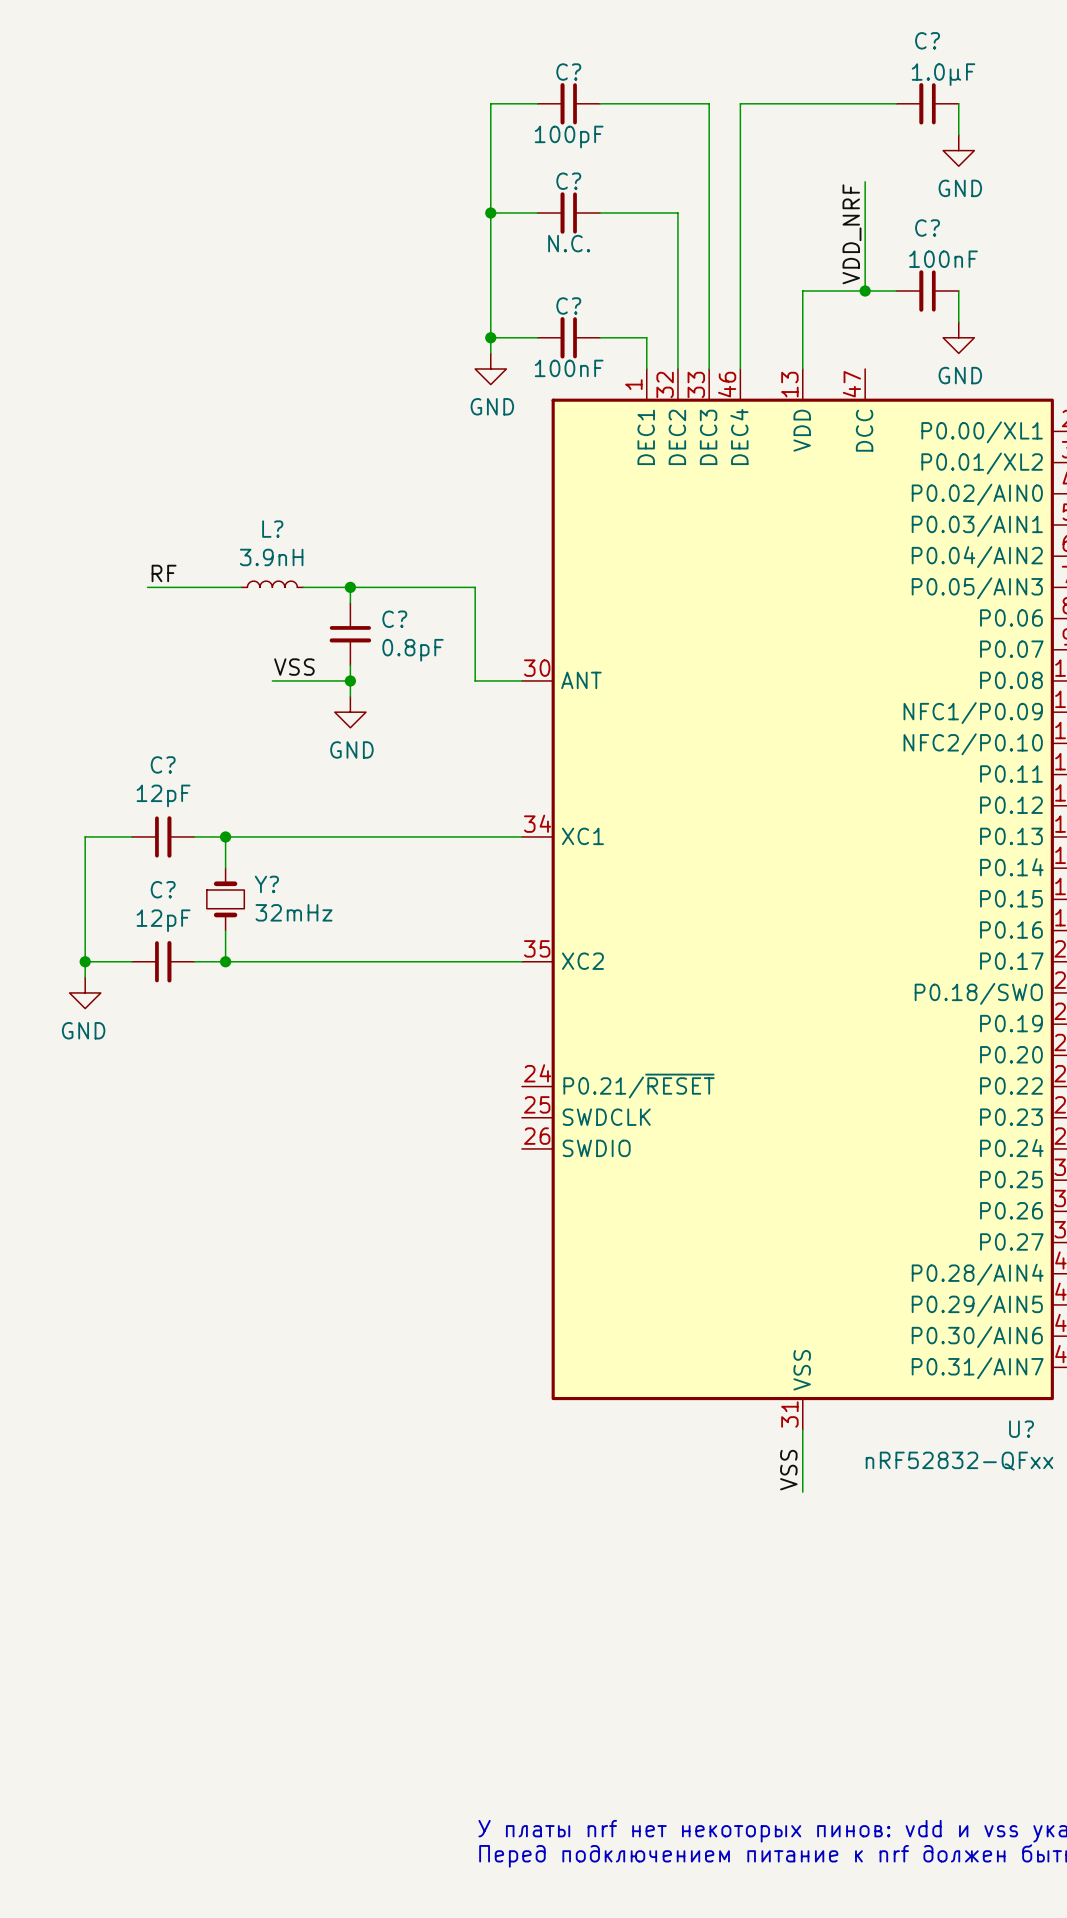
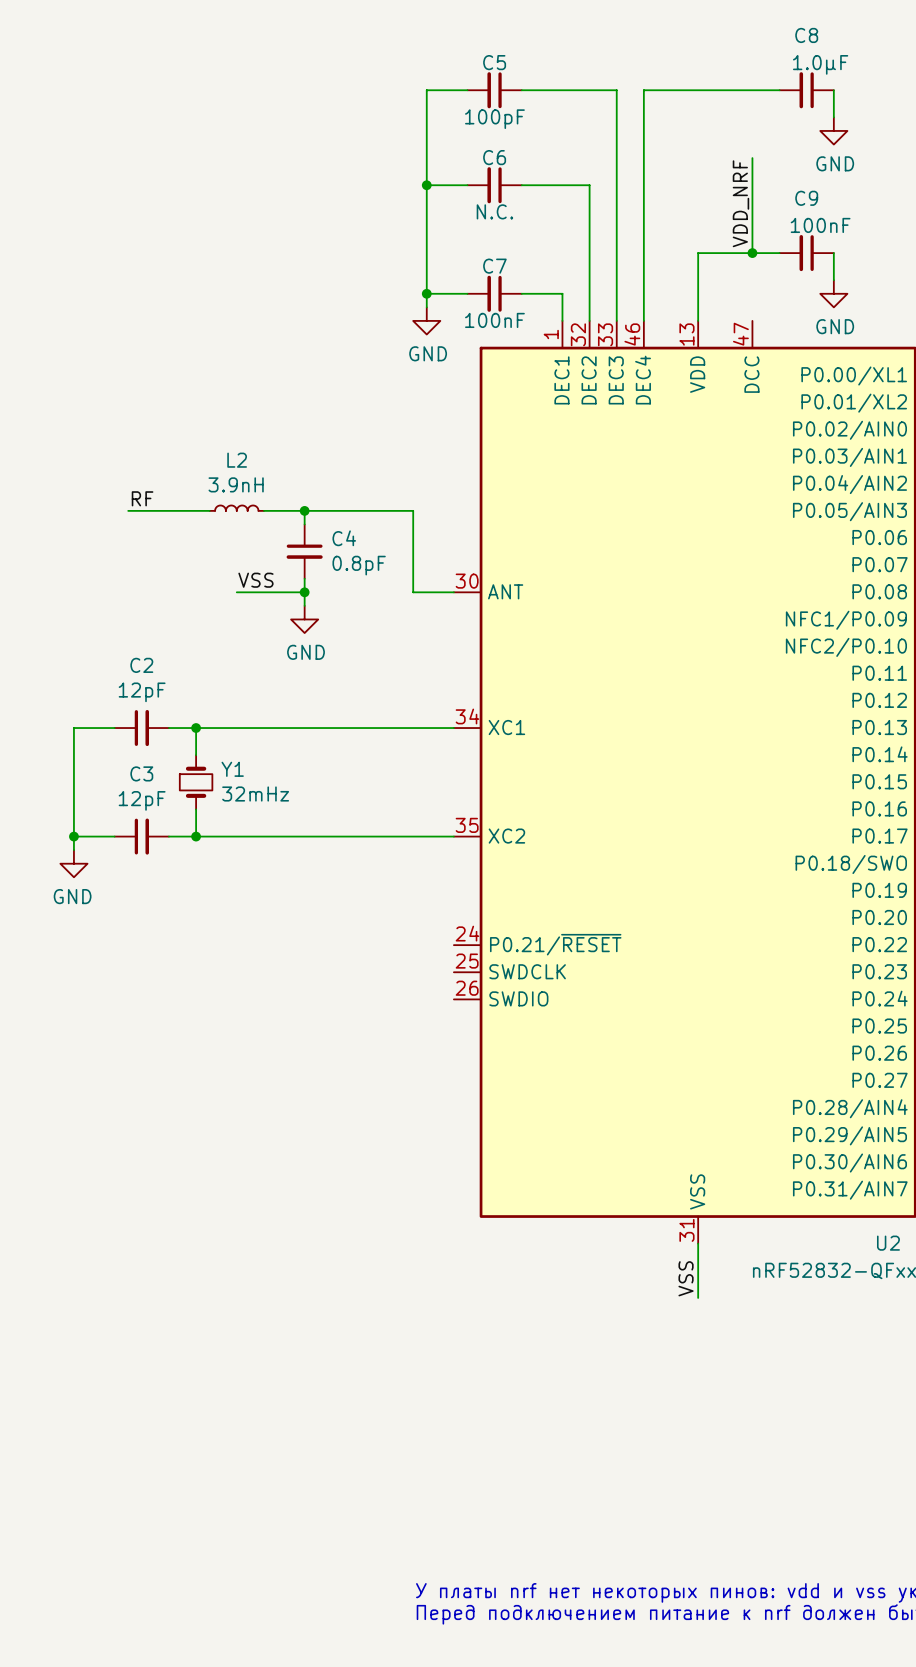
C? name: C? (927, 40) -> C8 (806, 35)
C? name: C? (568, 72) -> C5 (494, 62)
C? name: C? (568, 181) -> C6 (494, 157)
C? name: C? (927, 228) -> C9 (806, 198)
C? name: C? (568, 306) -> C7 (494, 266)
L? name: L? (272, 529) -> L2 (237, 460)
C? name: C? (394, 619) -> C4 (344, 538)
C? name: C? (163, 764) -> C2 (141, 665)
Y? name: Y? (266, 884) -> Y1 (232, 769)
C? name: C? (163, 889) -> C3 (141, 773)
U? name: U? (1021, 1429) -> U2 (888, 1243)

